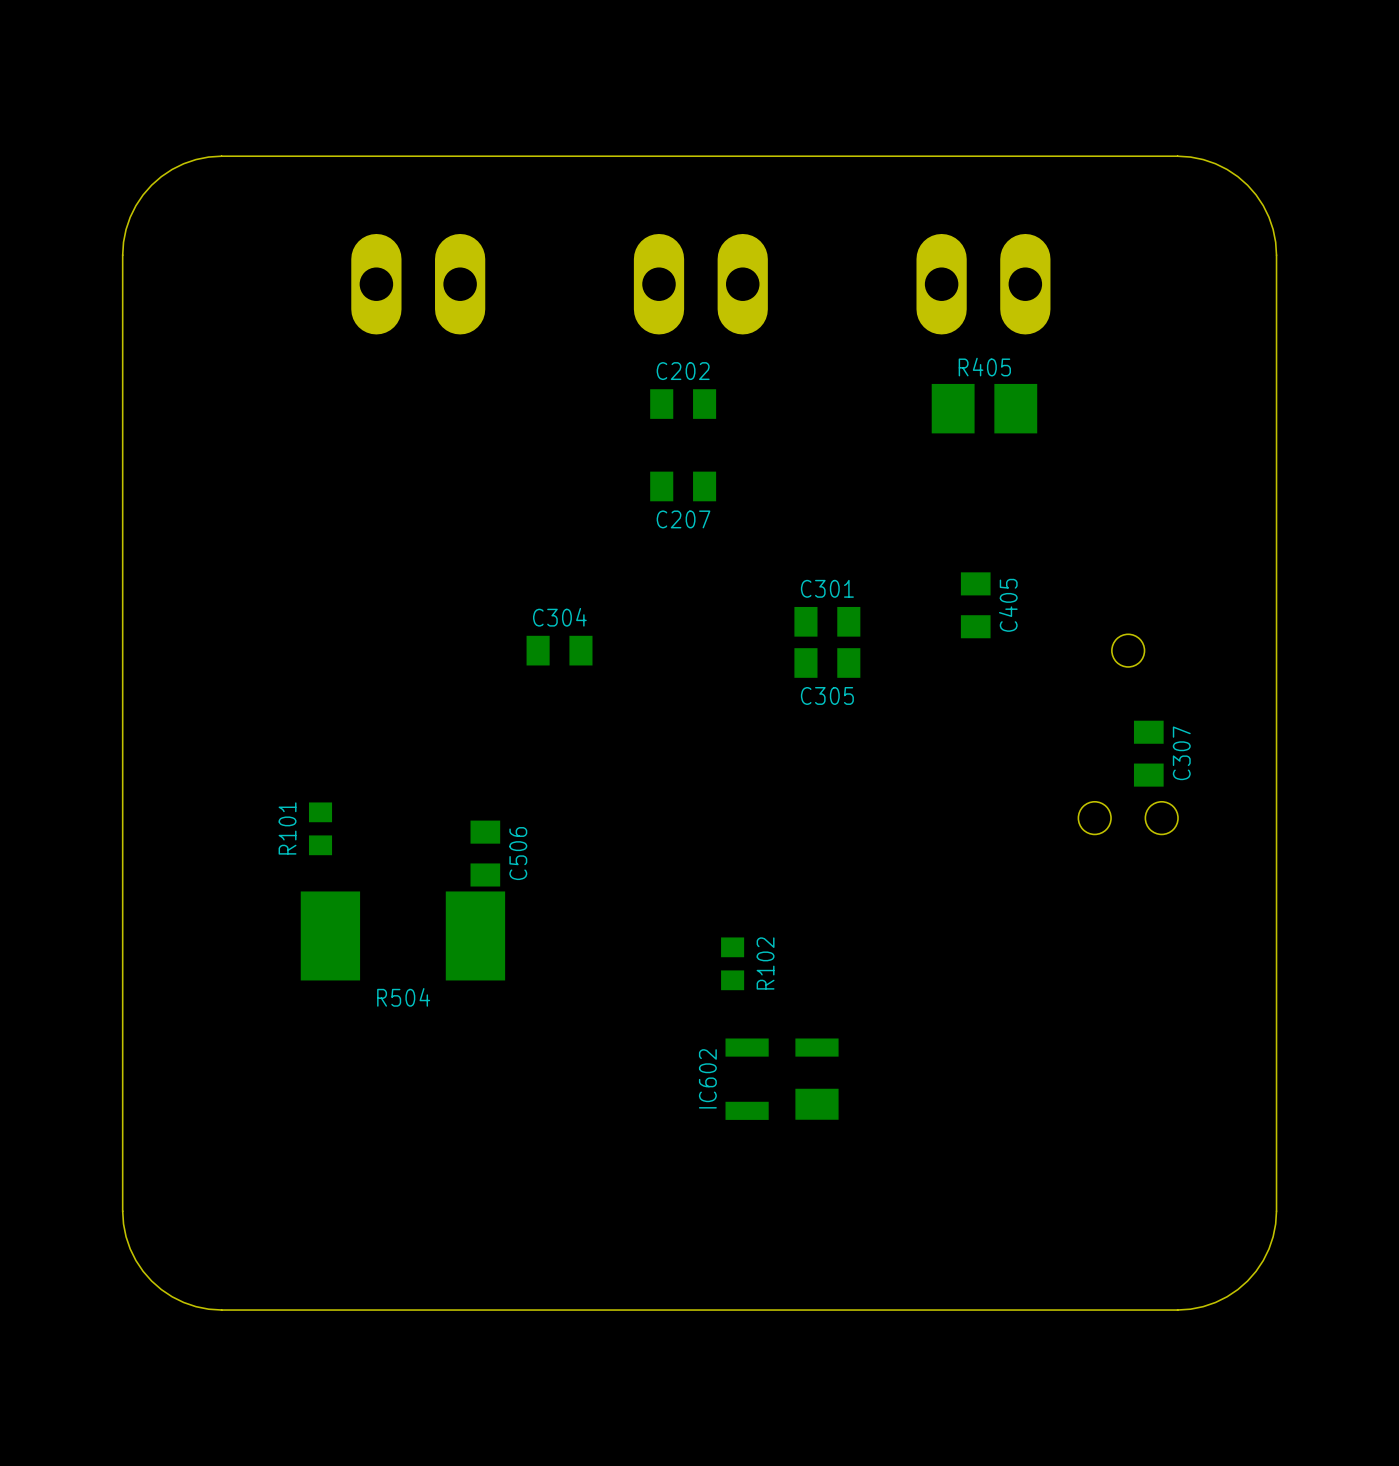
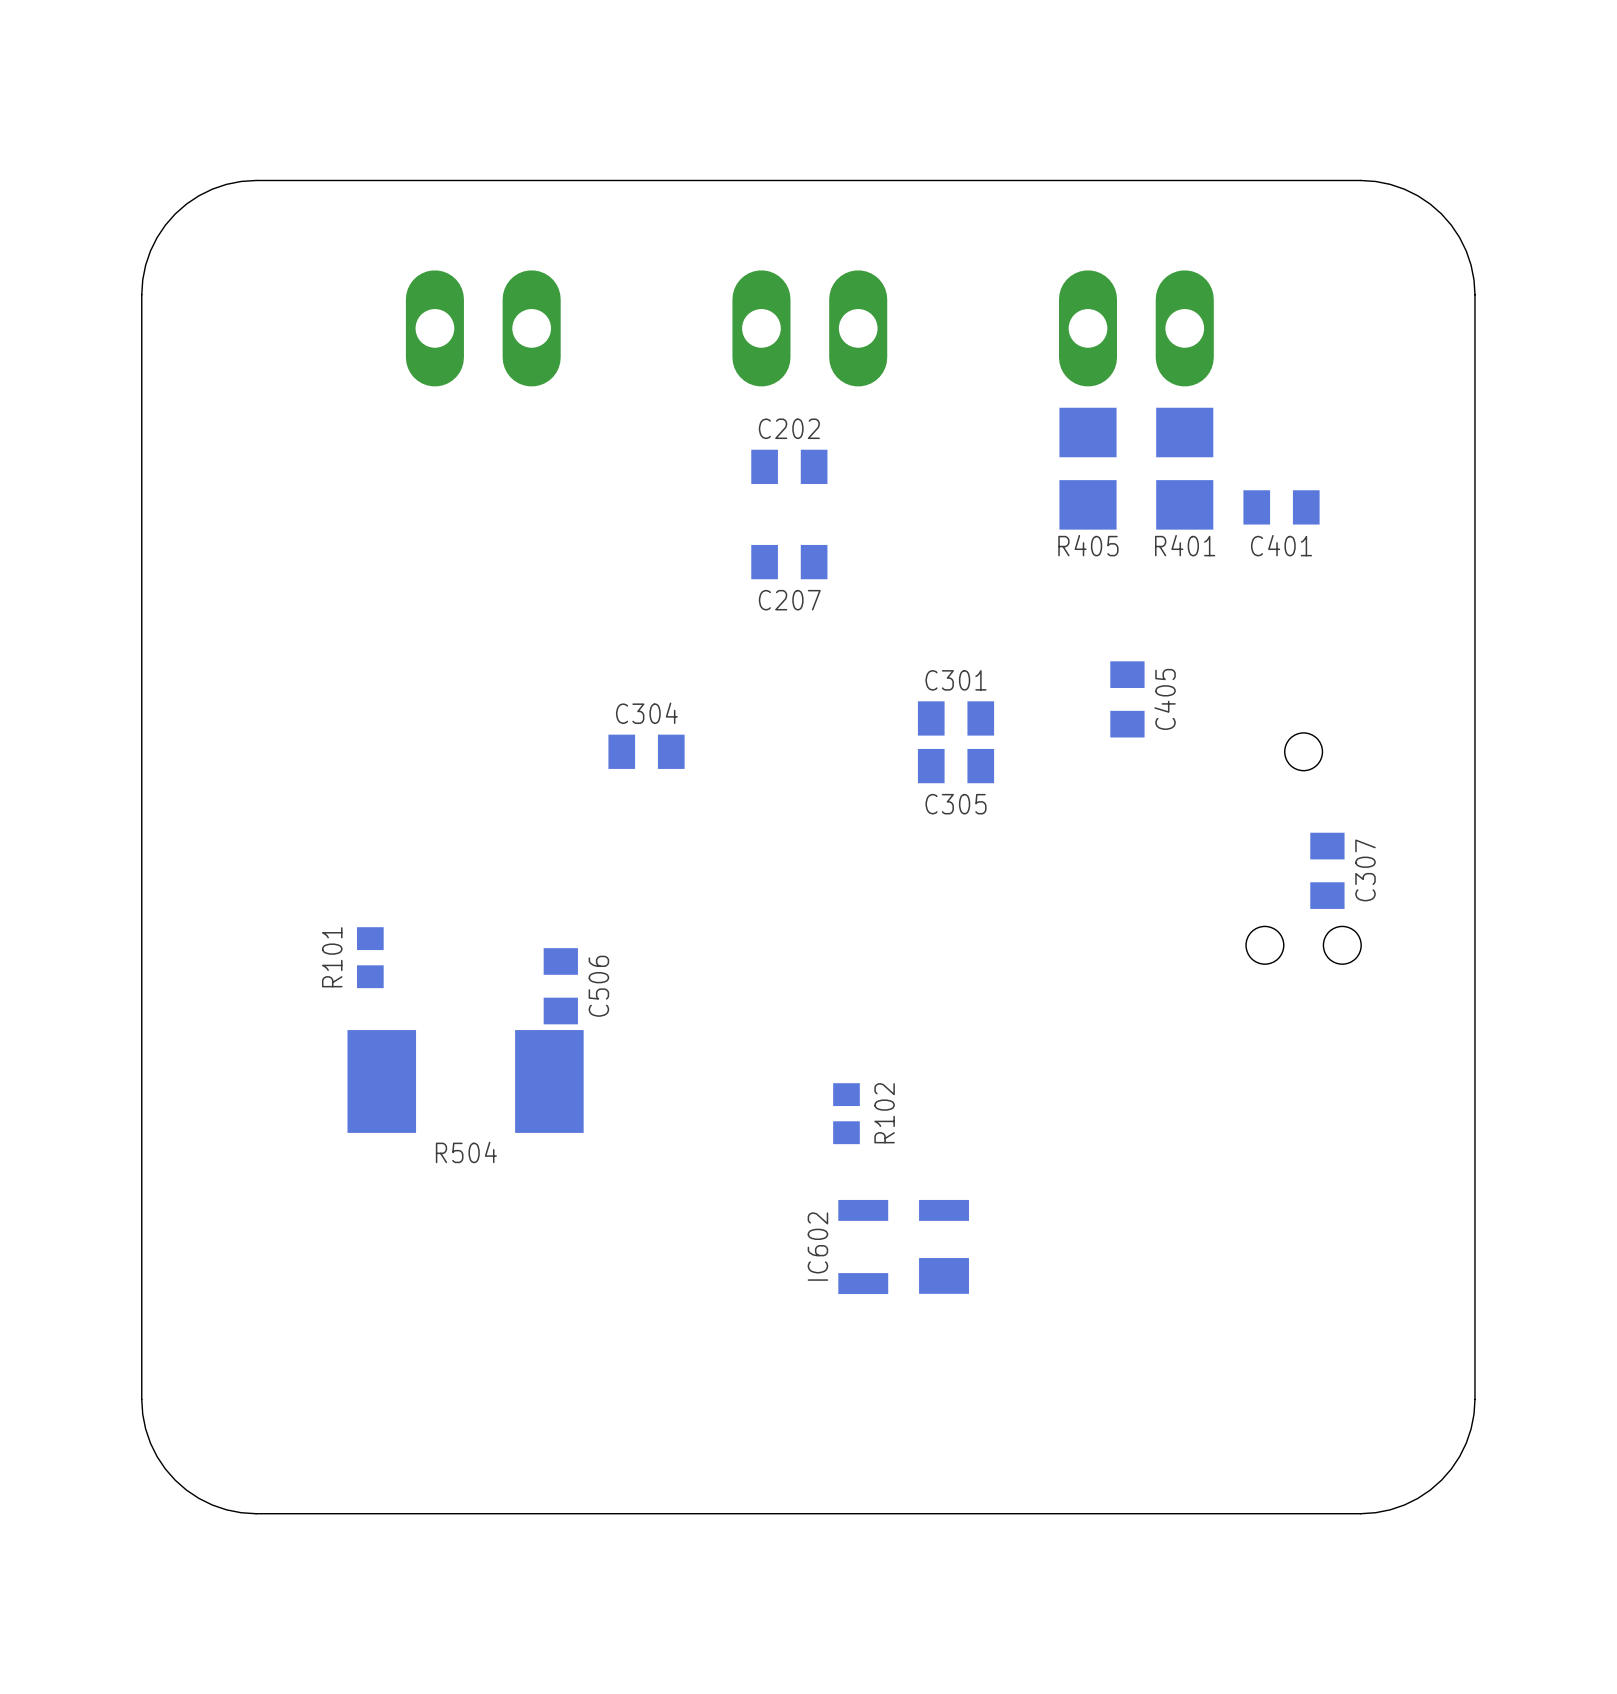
R405 name position: R405 (984, 367) -> R405 (1088, 545)
R401: none -> (1184, 468)
R405 rotation: 0° (984, 408) -> 90° clockwise (1088, 468)
C401: none -> (1281, 507)

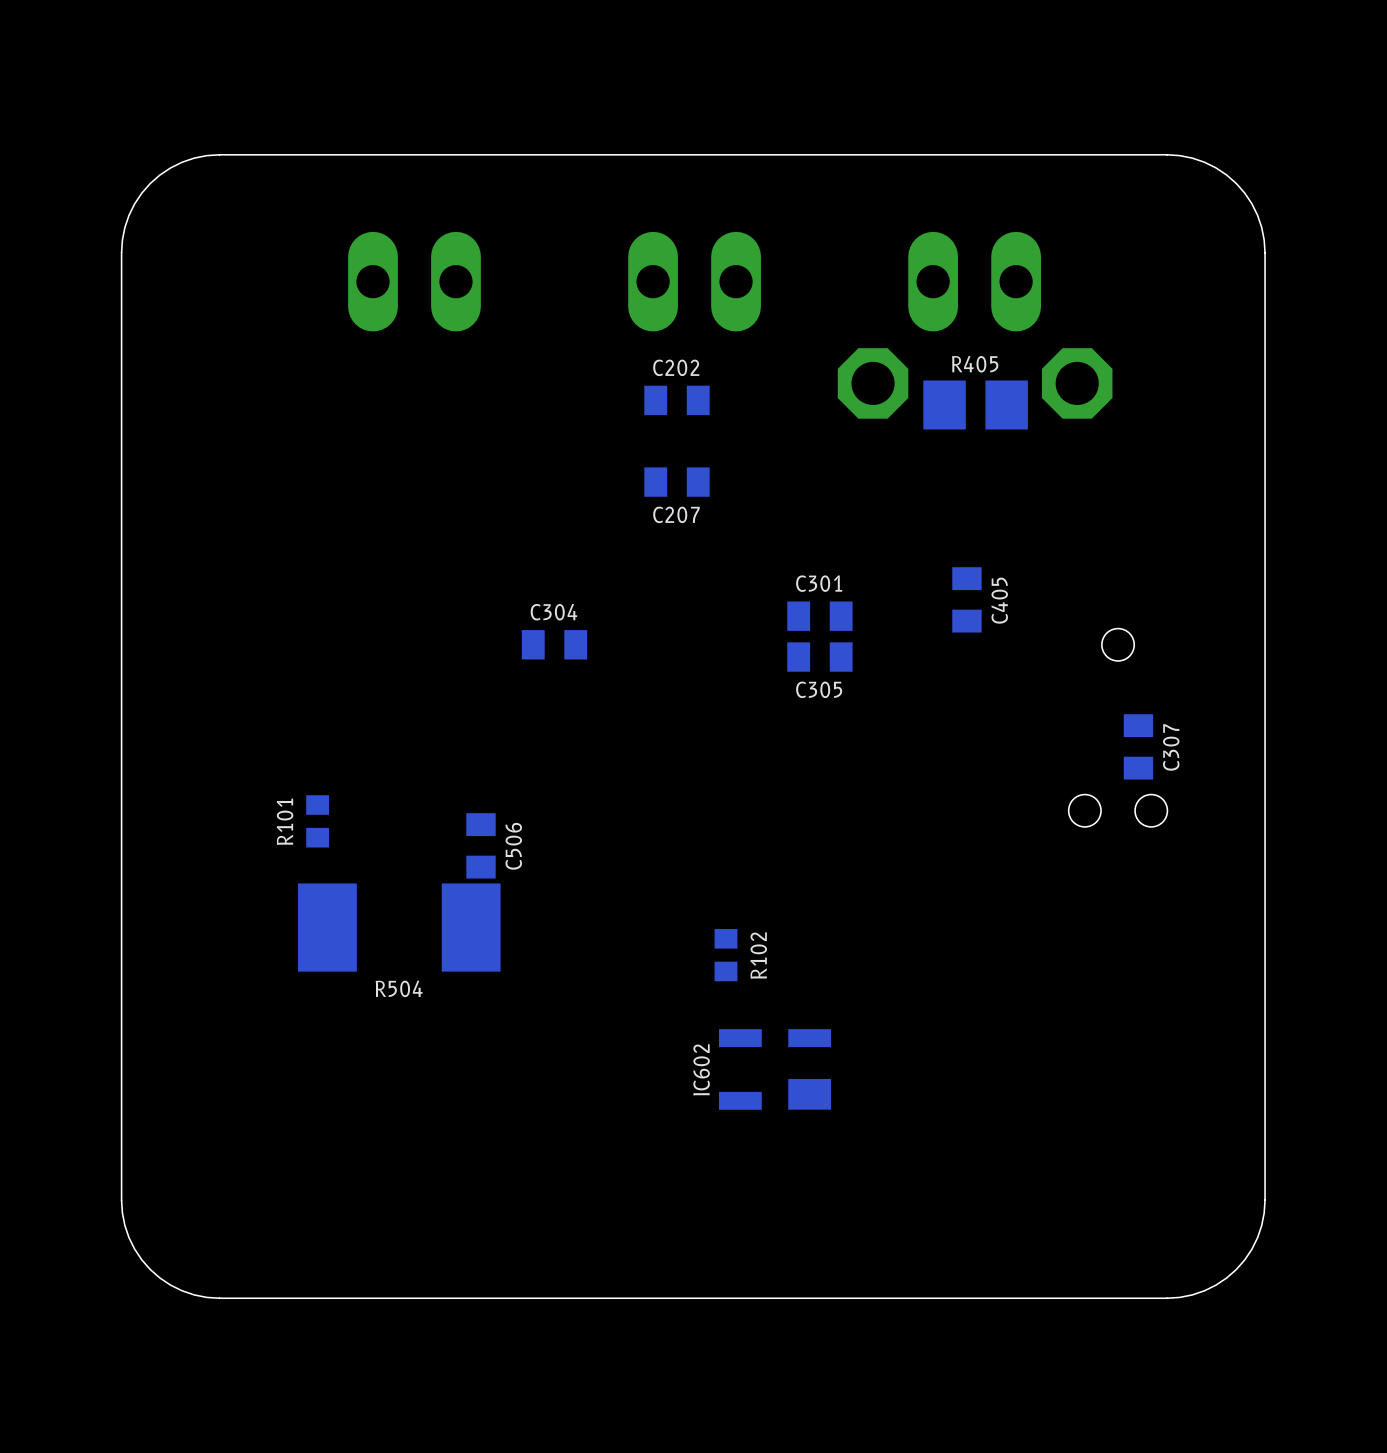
part: none -> (873, 383)
part: none -> (1077, 383)
R405 rotation: 0° (1088, 468) -> 90° clockwise (975, 404)
R401: (1184, 468) -> none
C401: (1281, 507) -> none
R405 name position: R405 (1088, 545) -> R405 (975, 364)

